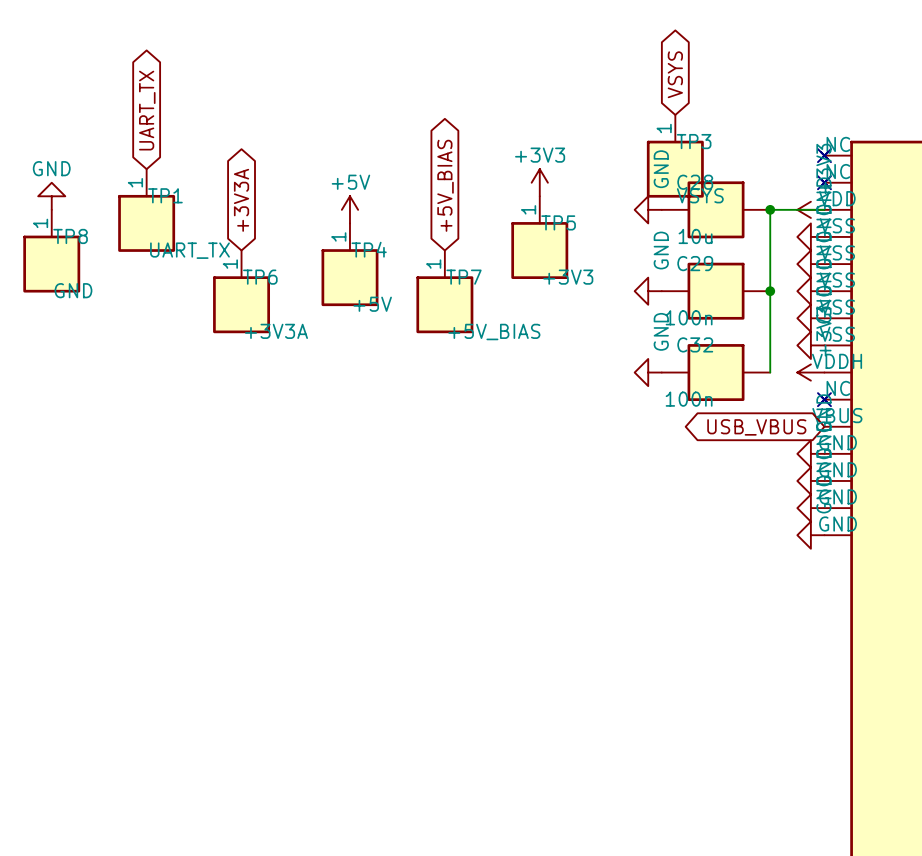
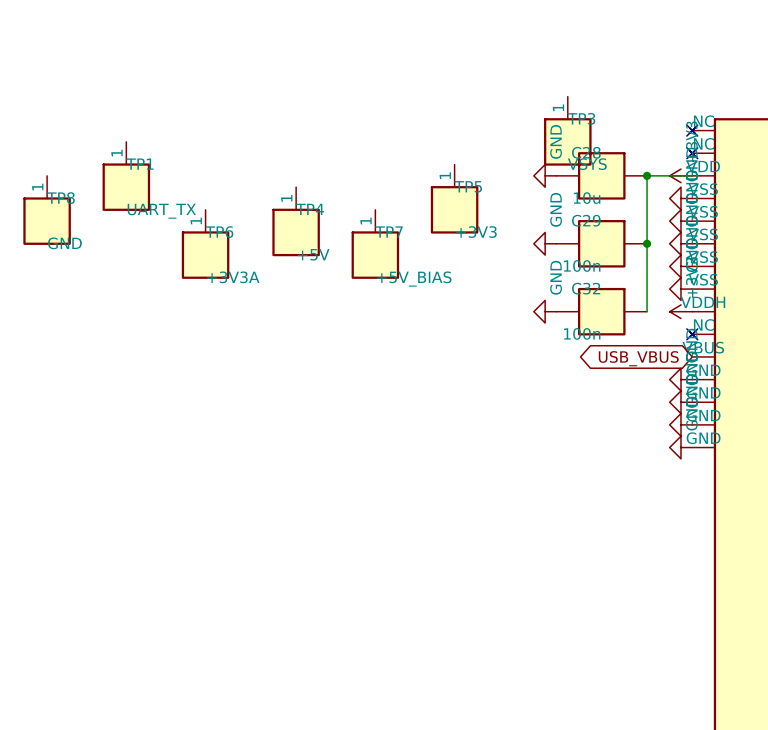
global label: VSYS (675, 74) -> none
global label: UART_TX (147, 110) -> none
power symbol: +3V3 (539, 182) -> none
global label: +5V_BIAS (445, 185) -> none
power symbol: GND (51, 196) -> none
global label: +3V3A (241, 200) -> none
power symbol: +5V (349, 209) -> none

